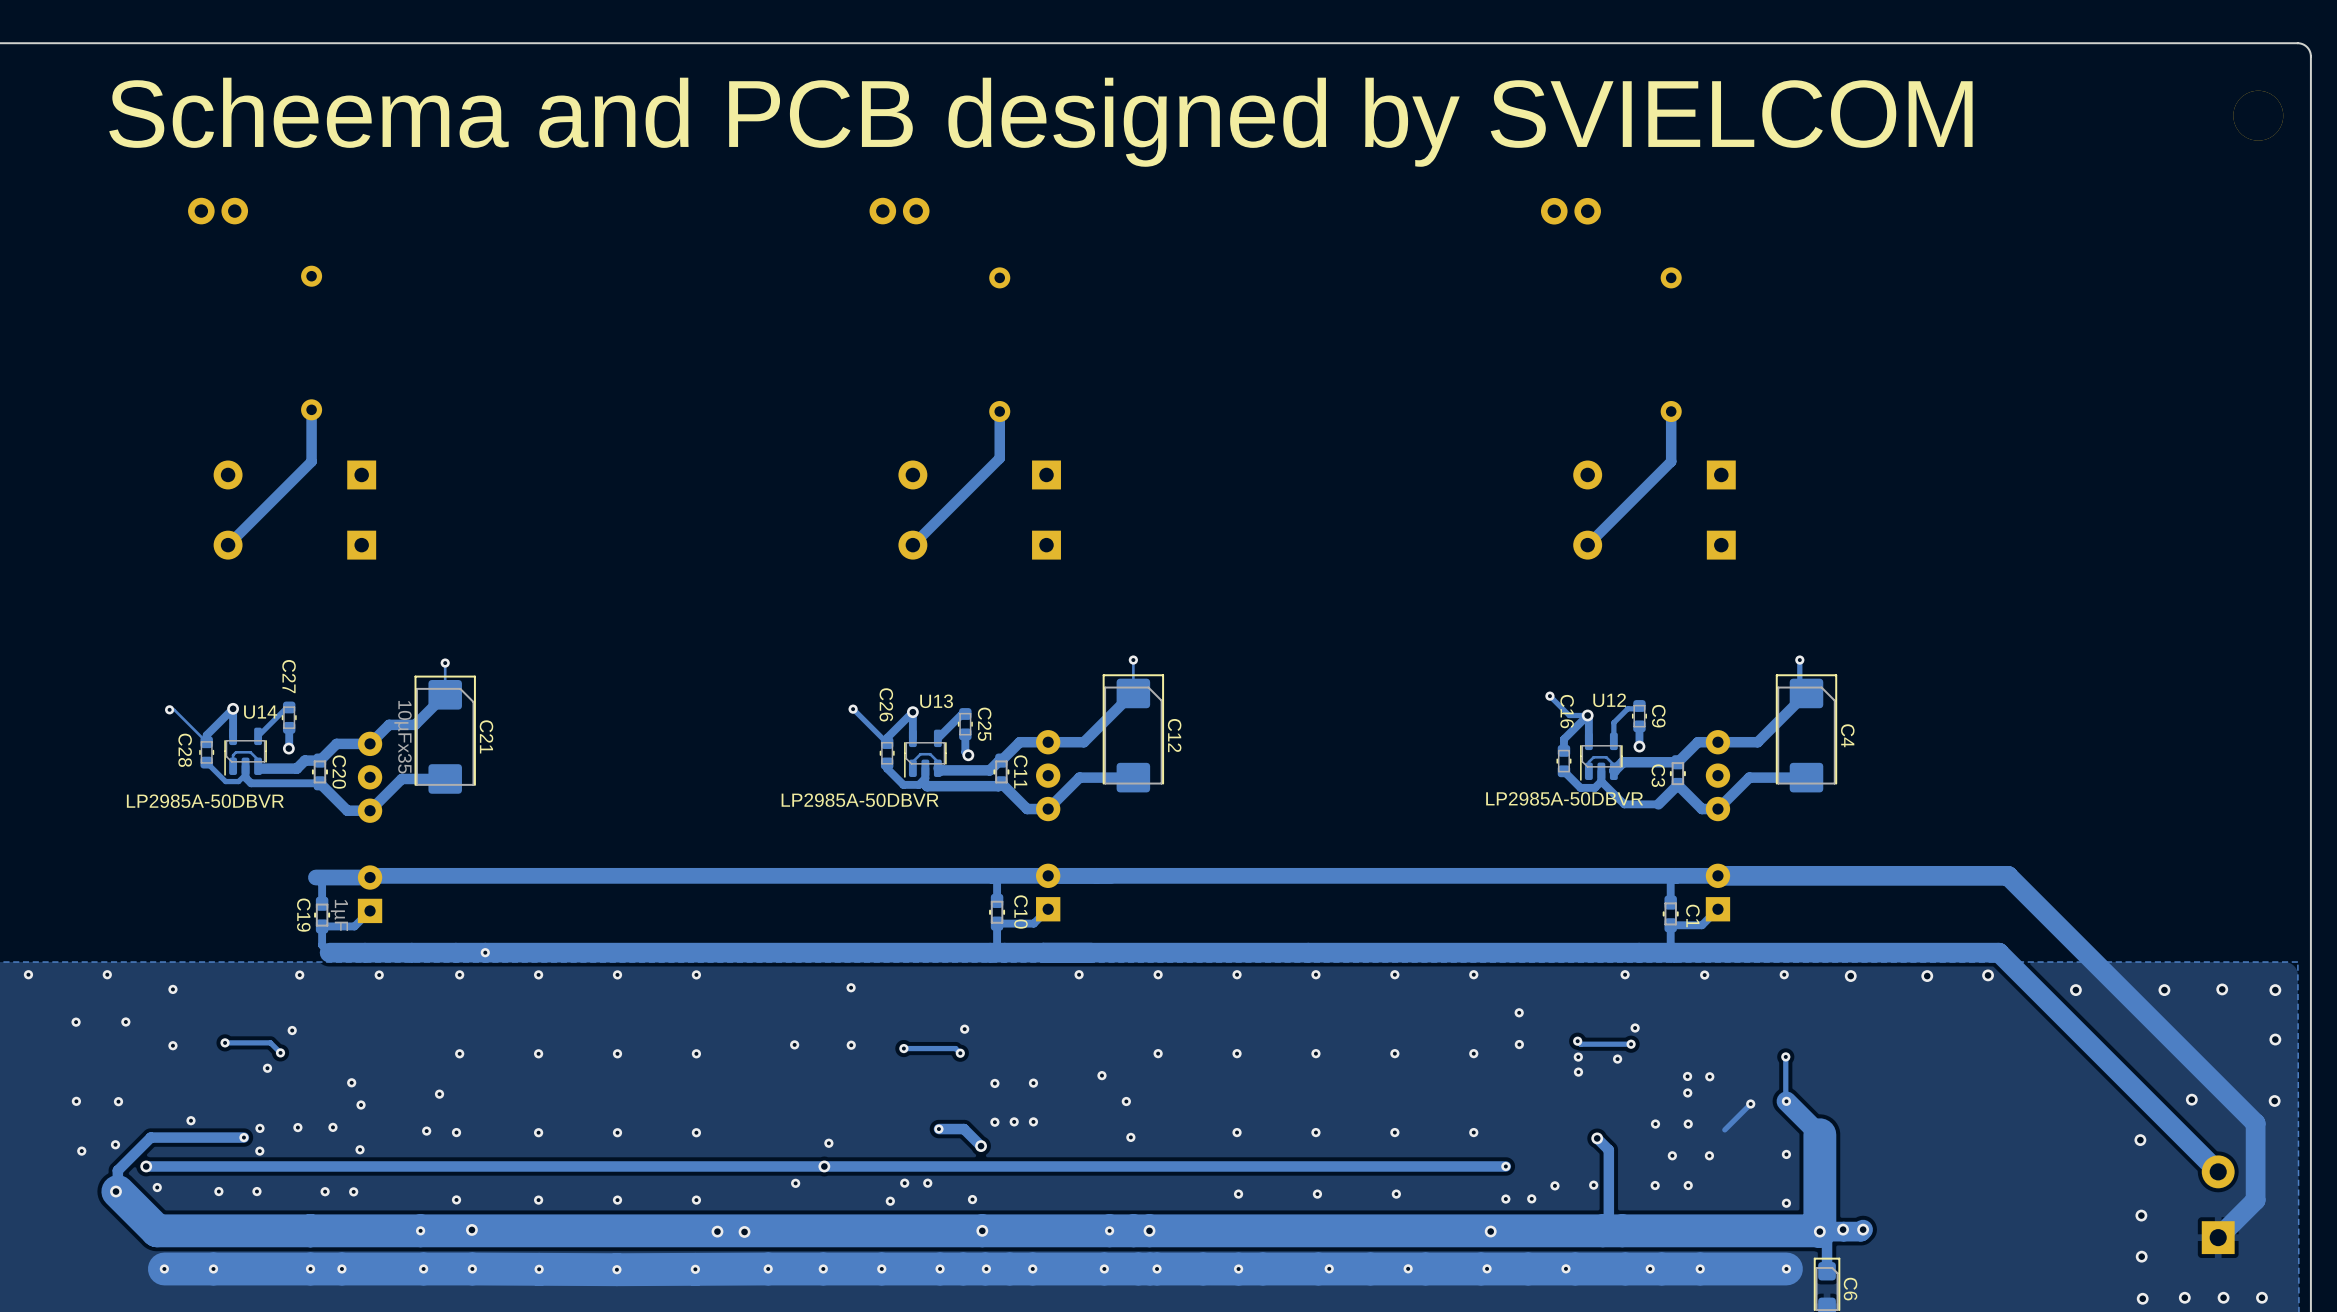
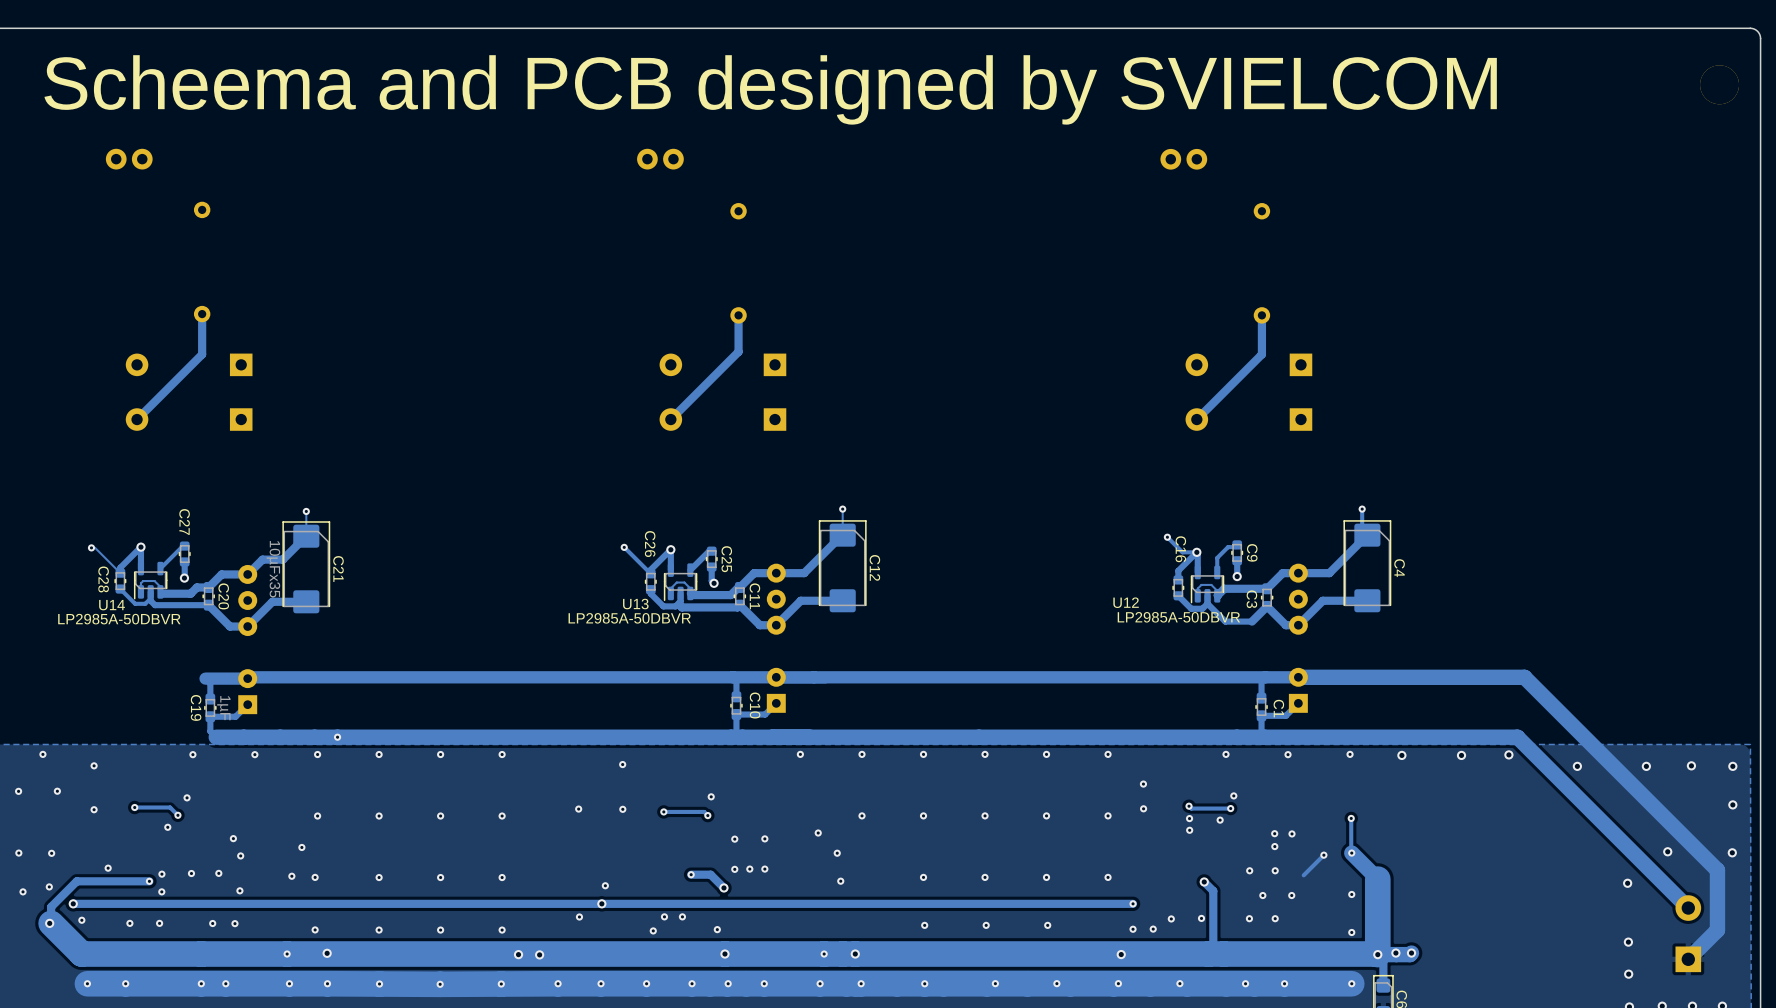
U12 name position: U12 (1609, 700) -> U12 (1126, 602)
U13 name position: U13 (936, 701) -> U13 (635, 604)
U14 name position: U14 (260, 712) -> U14 (112, 605)

